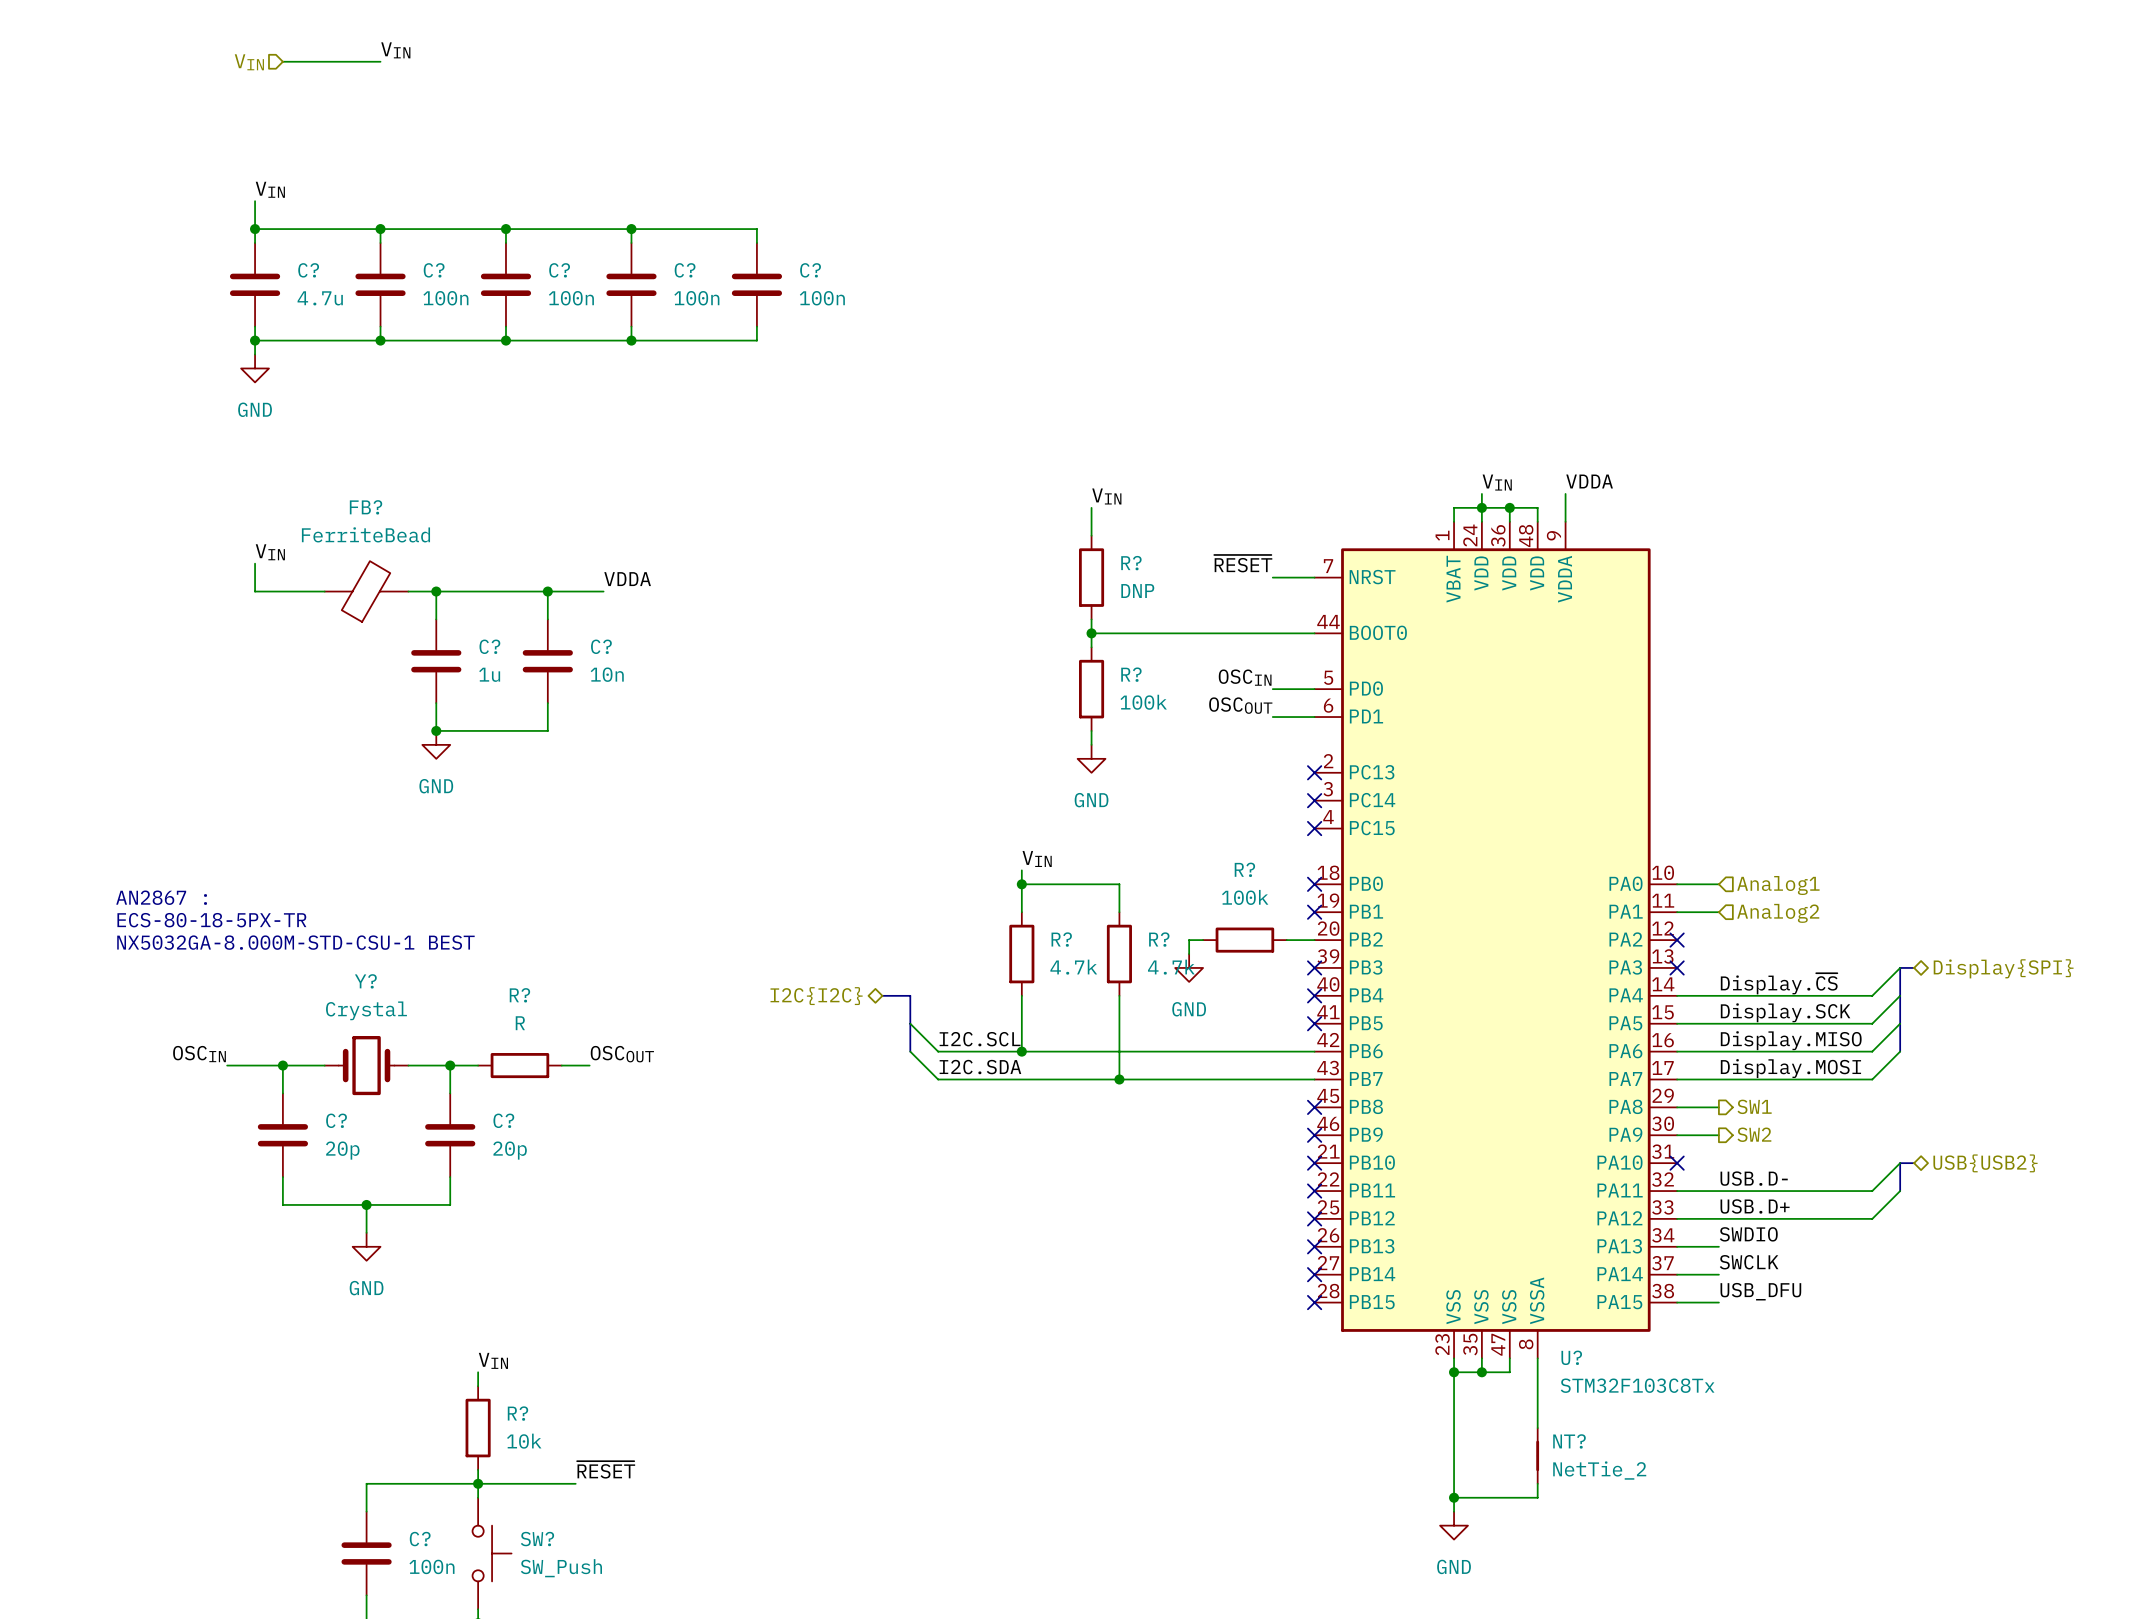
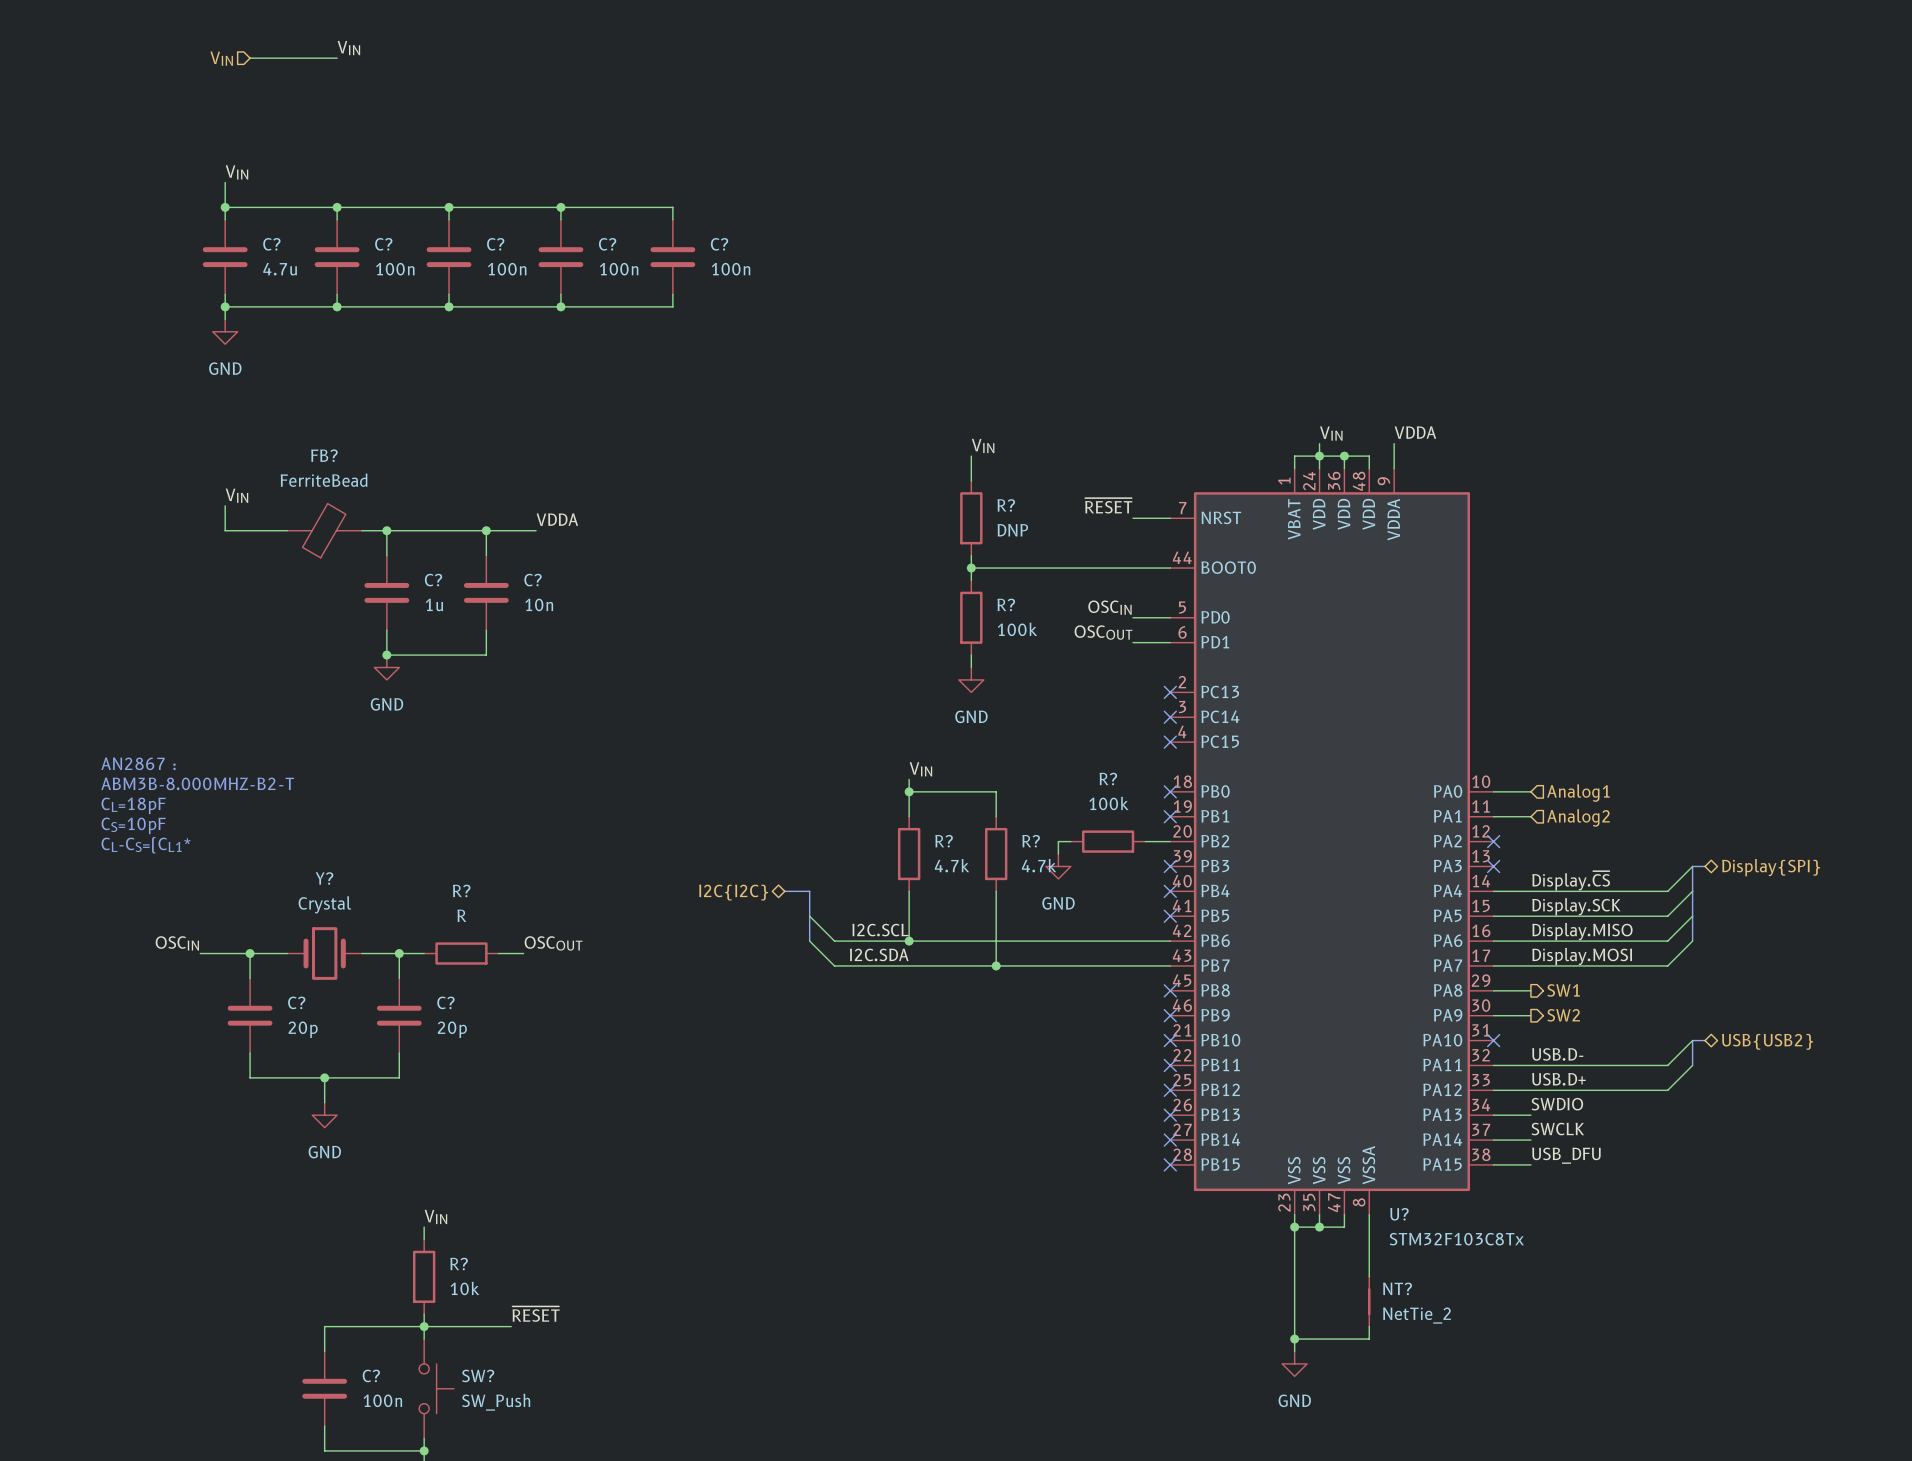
text: none -> AN2867 : (138, 763)
text: none -> ABM3B-8.000MHZ-B2-T (197, 783)
text: AN2867 : (161, 897) -> CL=18pF (133, 805)
text: ECS-80-18-5PX-TR (211, 920) -> CS=10pF (133, 825)
text: NX5032GA-8.000M-STD-CSU-1 BEST (295, 942) -> CL-CS=(CL1* (146, 845)

